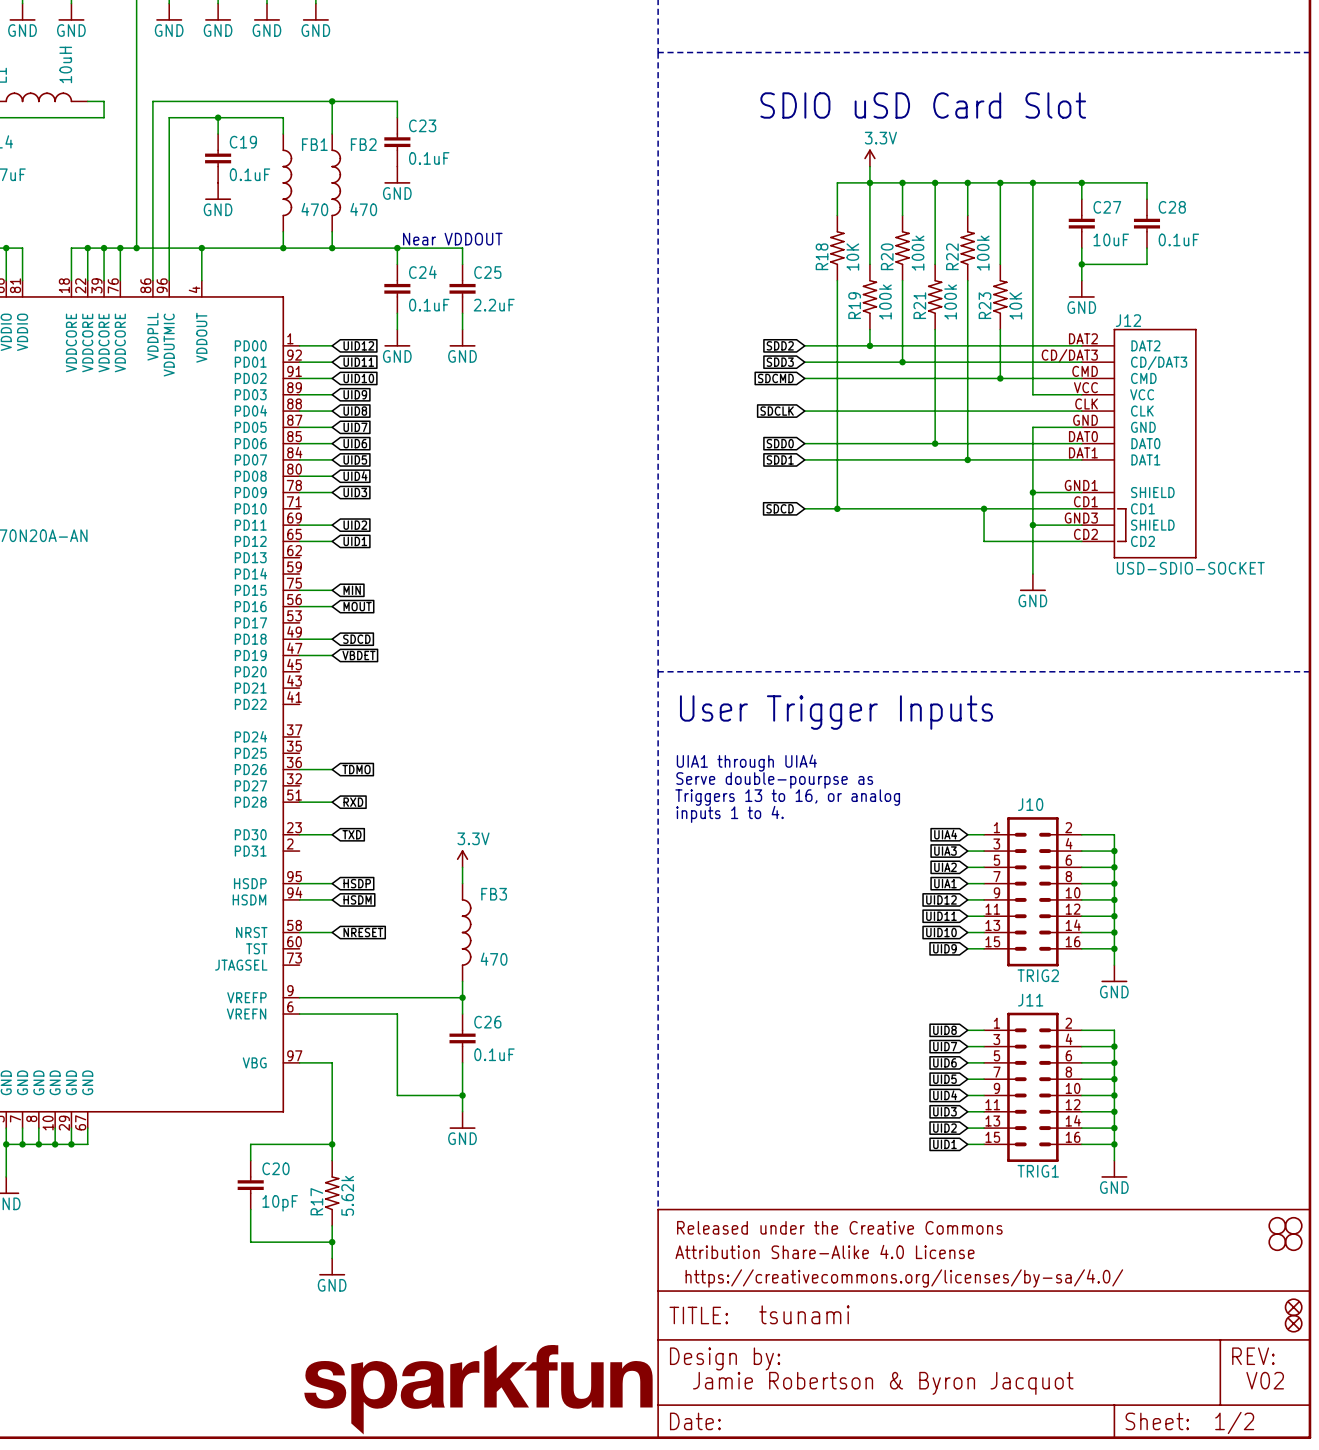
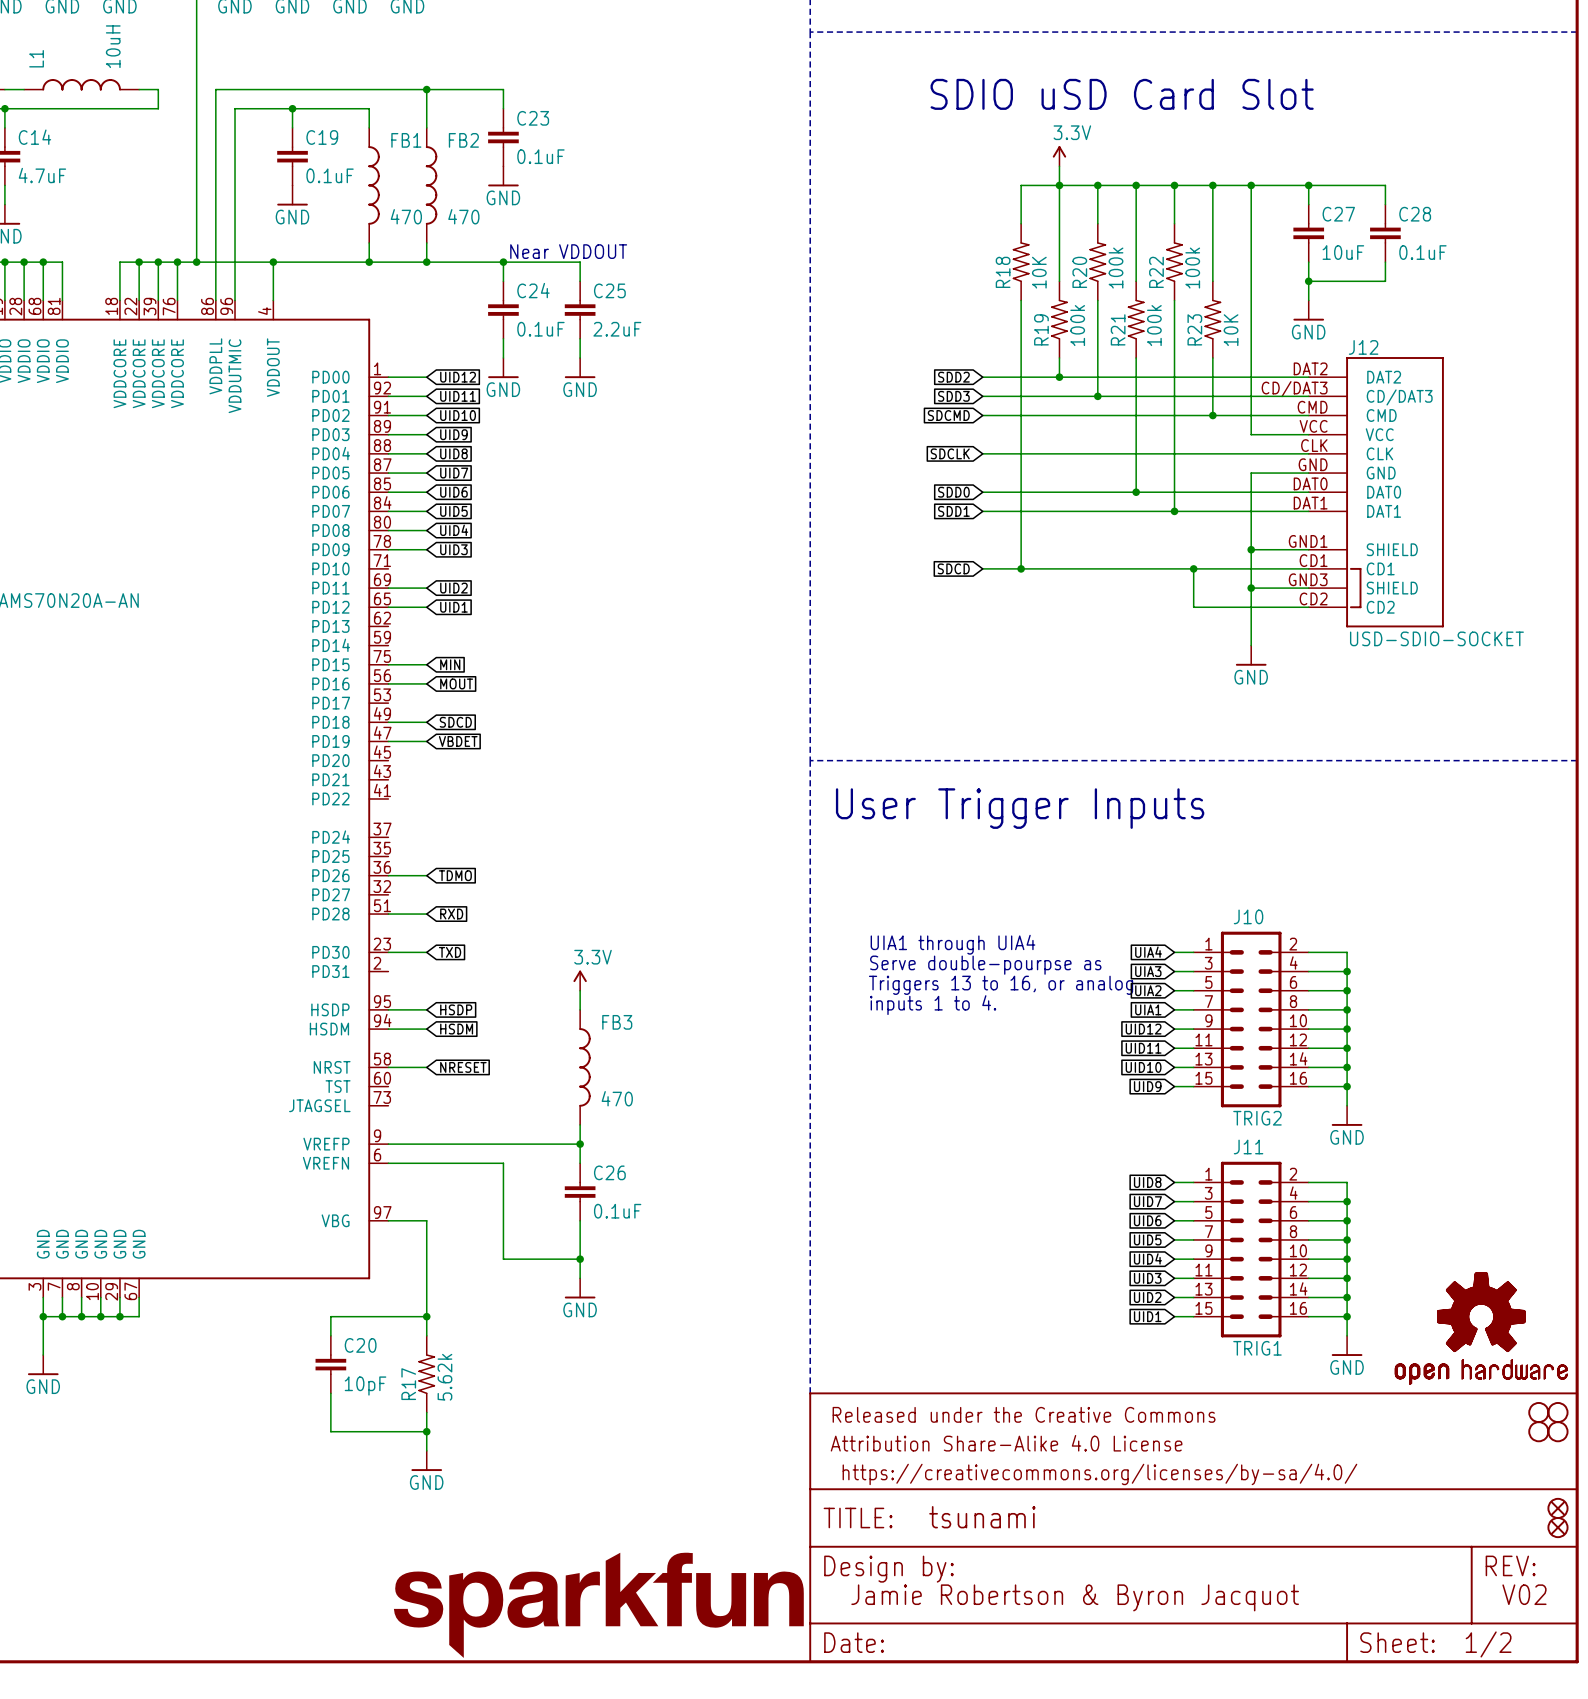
text position: UIA1 through UIA4 (746, 763) -> UIA1 through UIA4 (952, 944)
text position: Serve double-pourpse as (774, 780) -> Serve double-pourpse as (985, 965)
text position: Triggers 13 to 16, or analog (787, 797) -> Triggers 13 to 16, or analog (1001, 985)
text position: inputs 1 to 4. (730, 814) -> inputs 1 to 4. (933, 1005)
part: none -> (1481, 1328)

